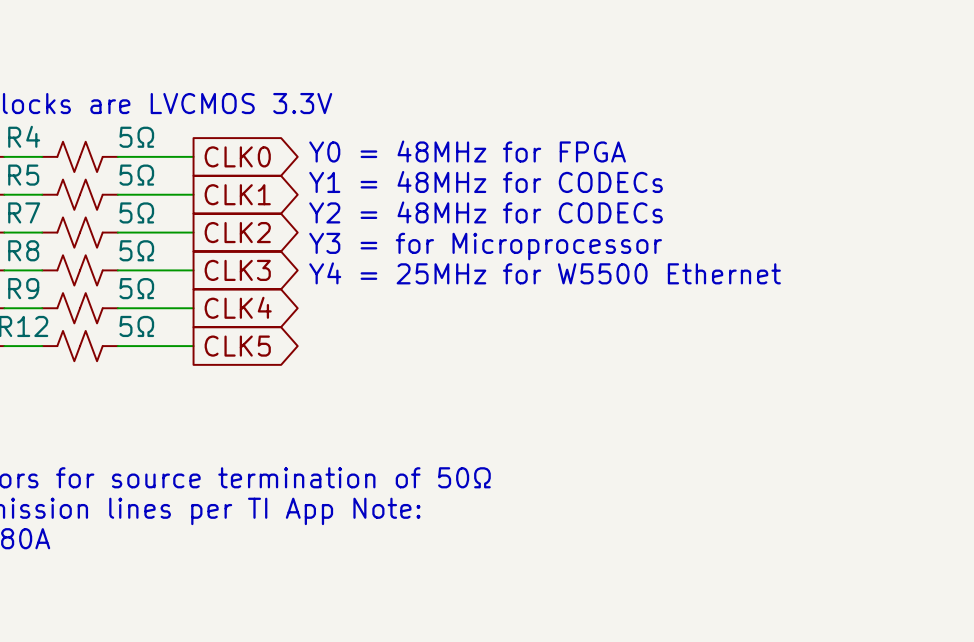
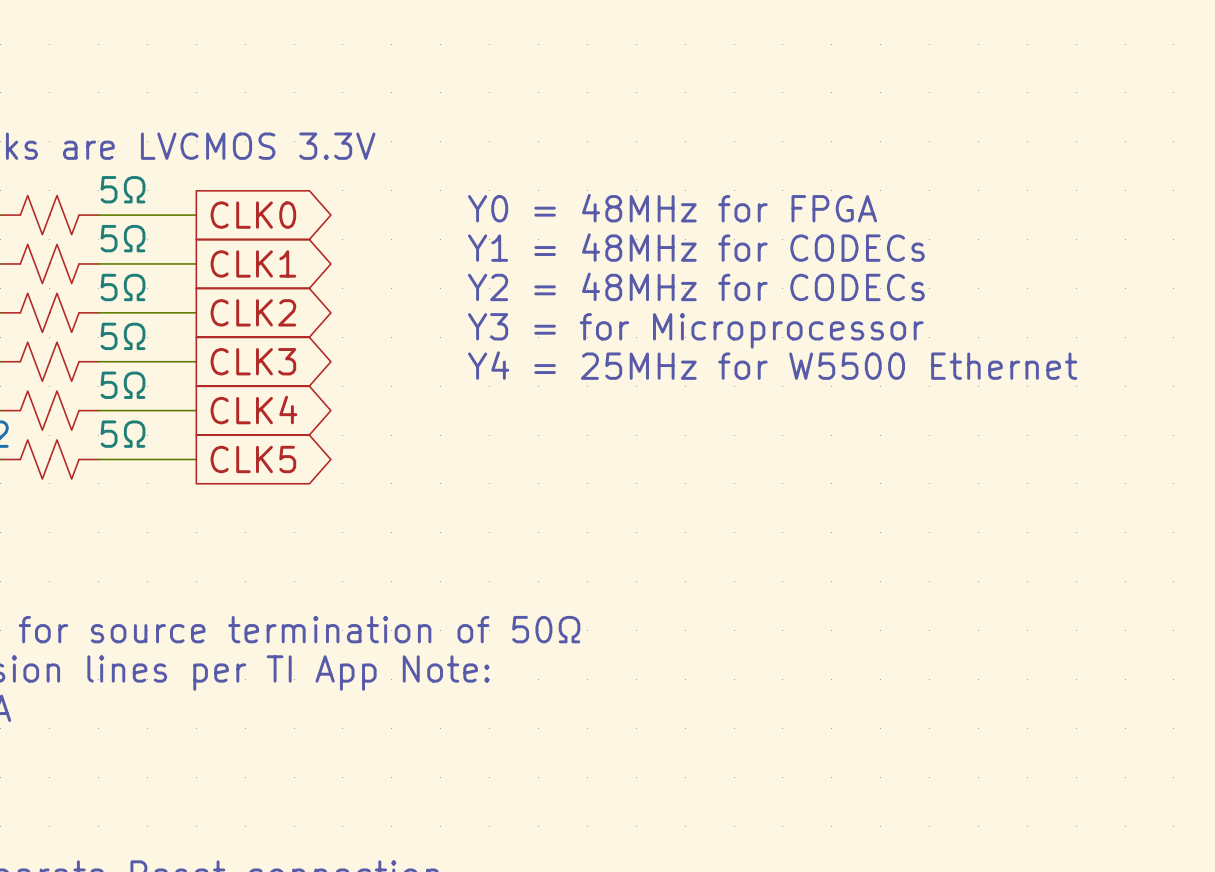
text position: Y0 = 48MHz for FPGA (467, 151) -> Y0 = 48MHz for FPGA (672, 208)
text position: Y1 = 48MHz for CODECs (486, 181) -> Y1 = 48MHz for CODECs (696, 247)
text position: Y2 = 48MHz for CODECs (486, 212) -> Y2 = 48MHz for CODECs (696, 286)
text position: Y3 = for Microprocessor (485, 246) -> Y3 = for Microprocessor (695, 330)
text position: Y4 = 25MHz for W5500 Ethernet (545, 273) -> Y4 = 25MHz for W5500 Ethernet (772, 365)

